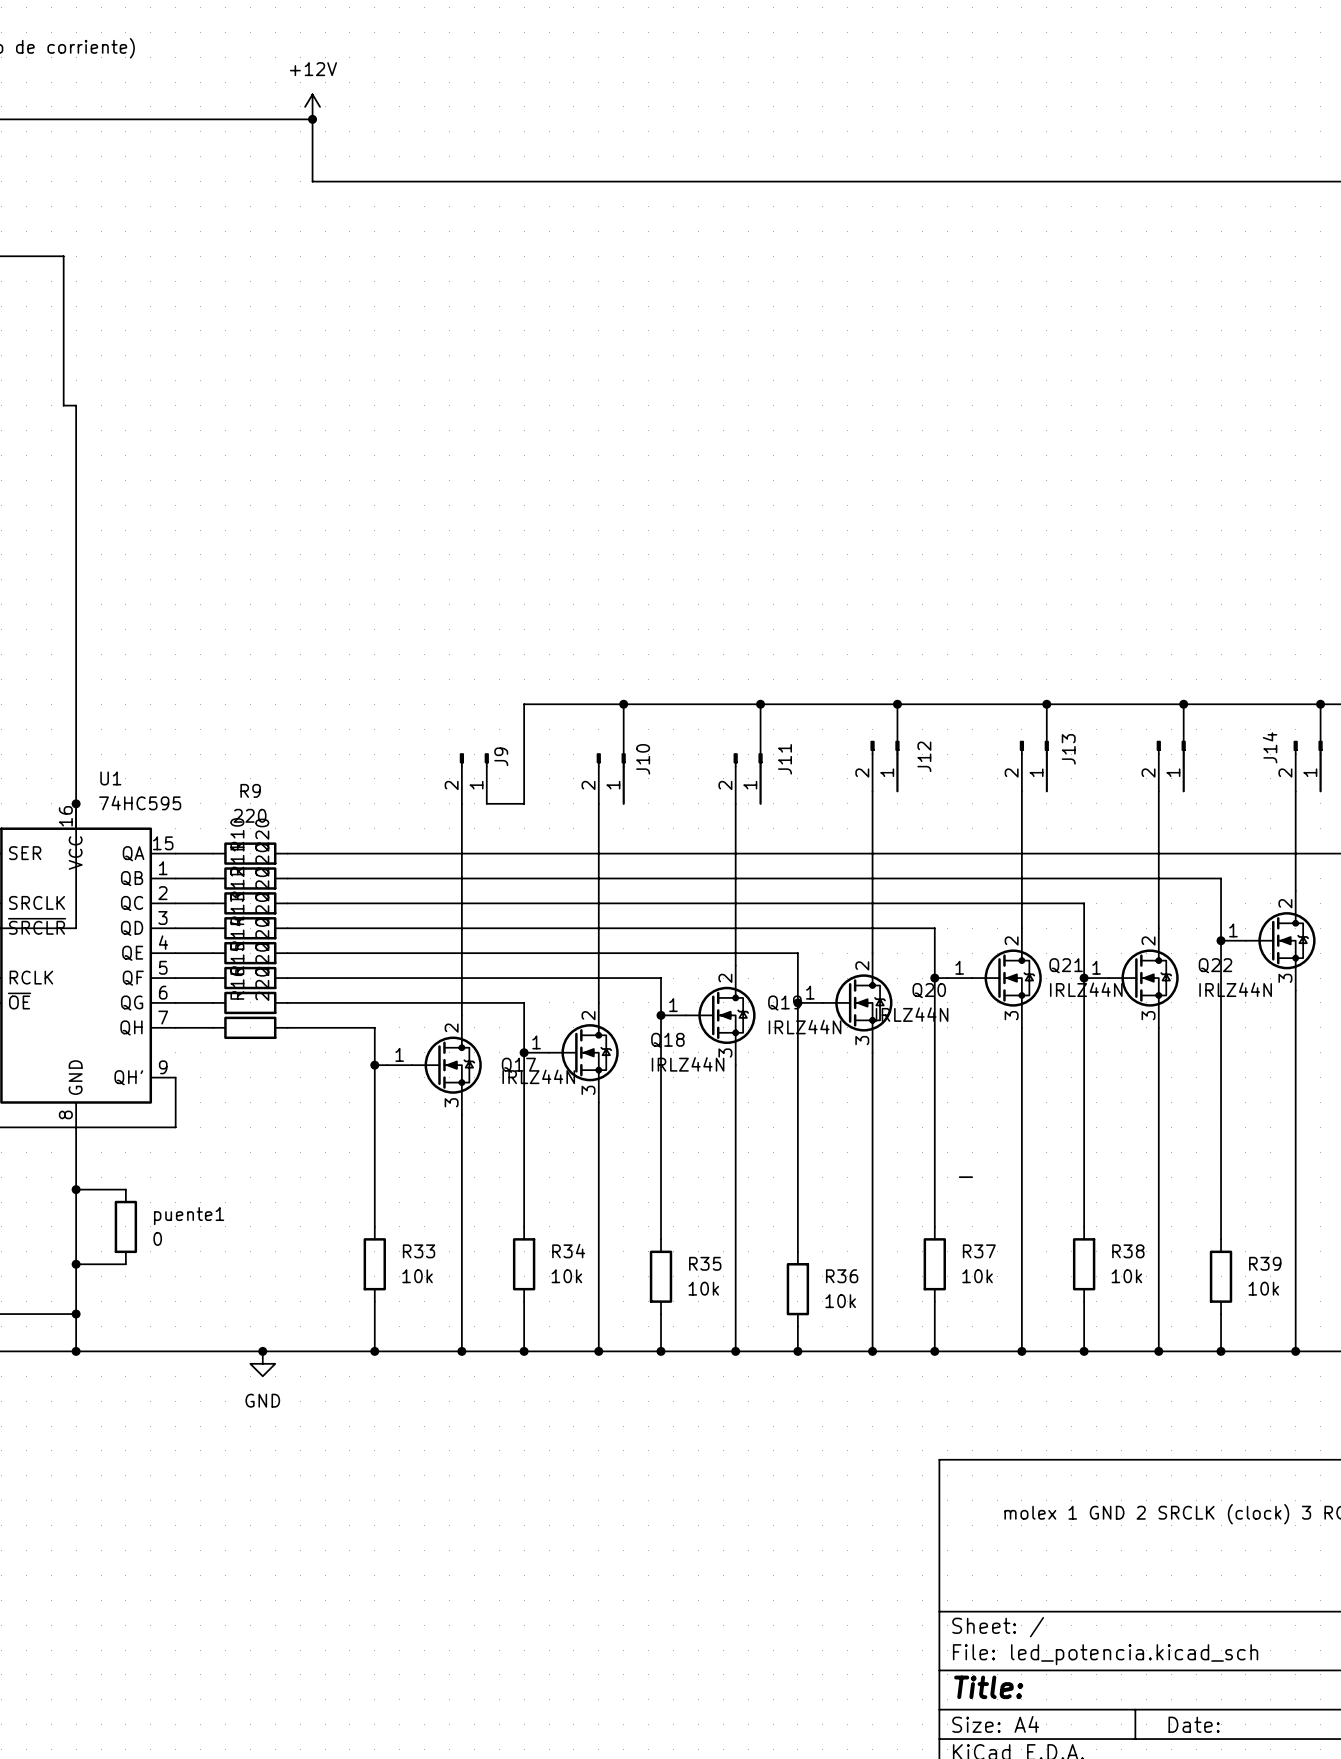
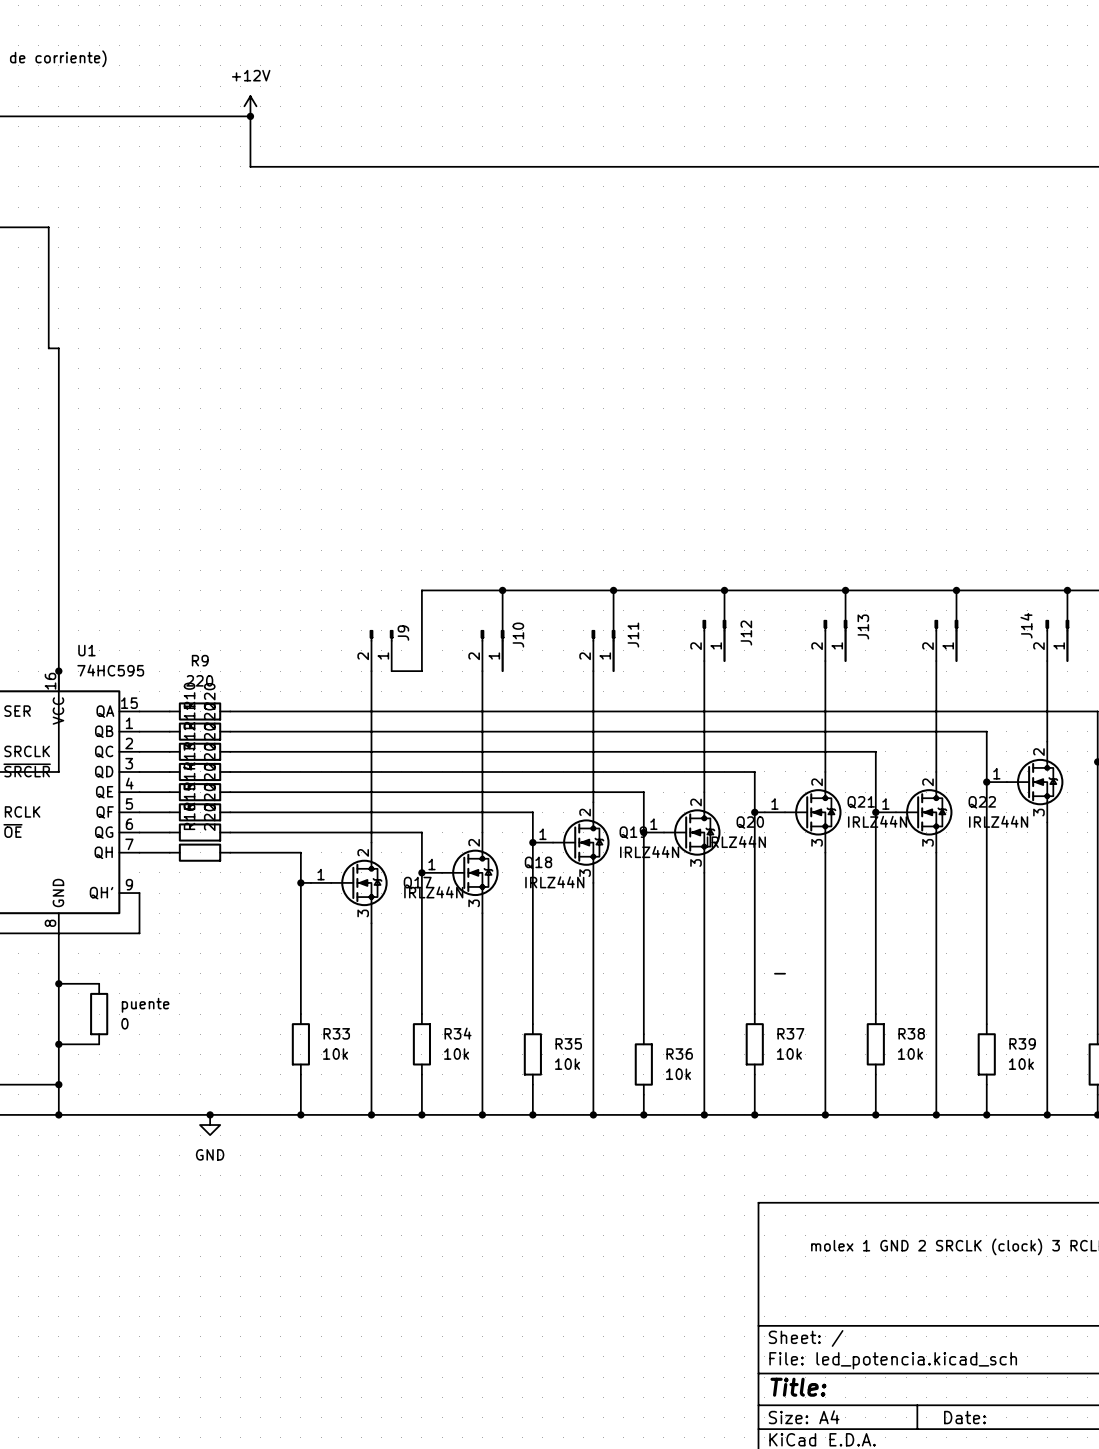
puente1 name: puente1 (189, 1216) -> puente (145, 1005)

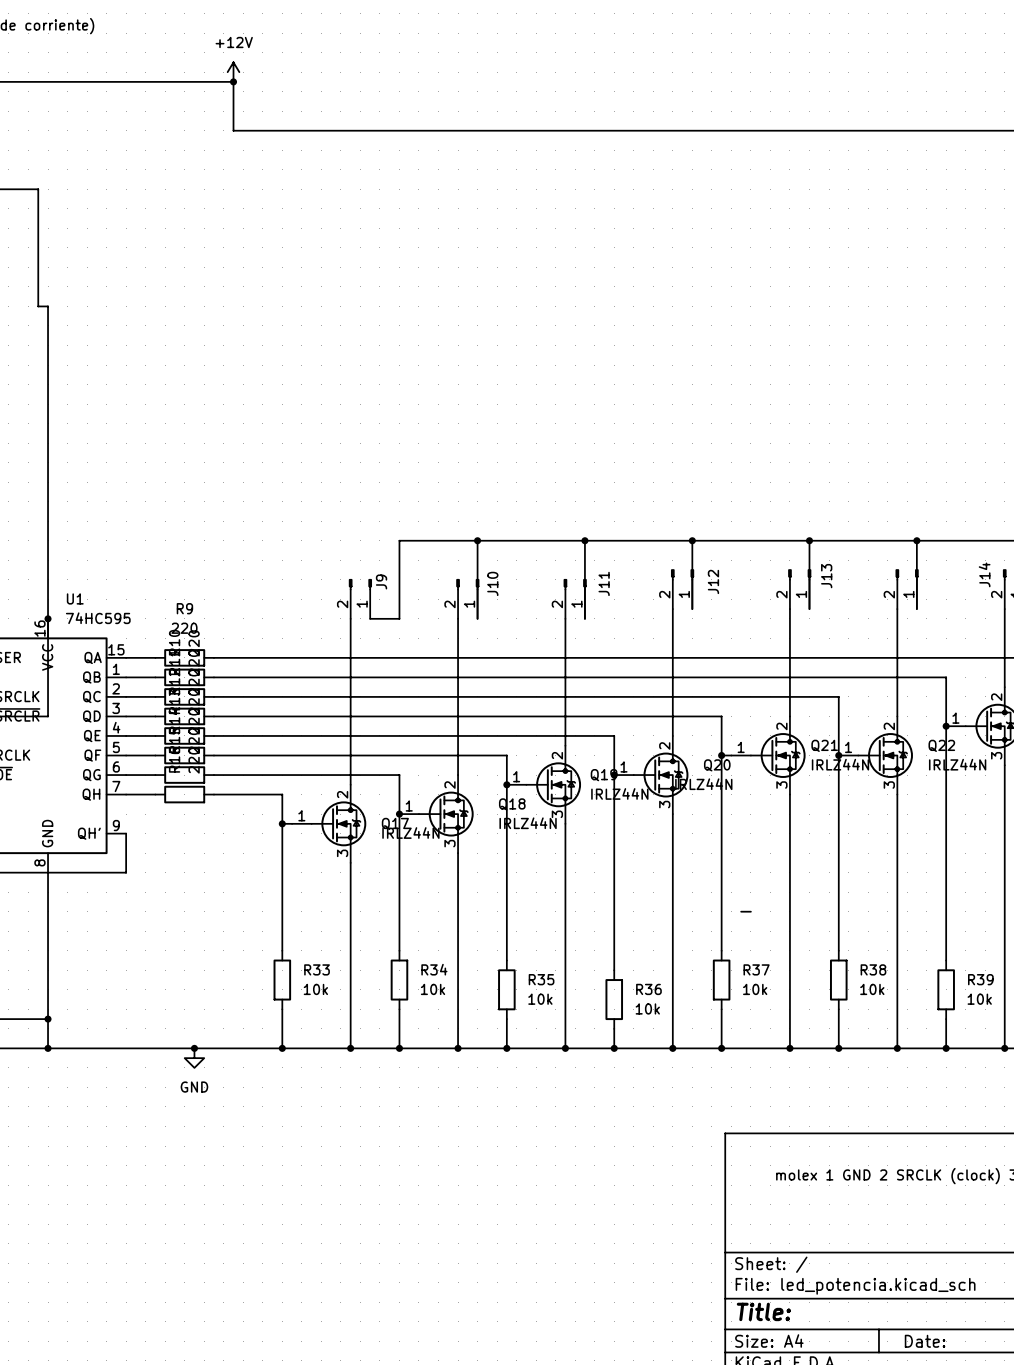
wire: (58, 983) (99, 983) -> none
junction: (58, 983) -> none
puente: 0 (99, 1014) -> none
wire: (58, 1044) (99, 1044) -> none
junction: (58, 1044) -> none

